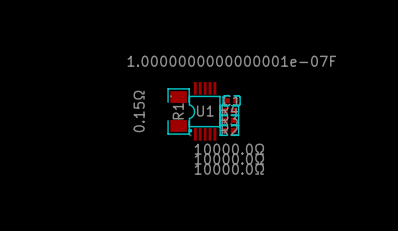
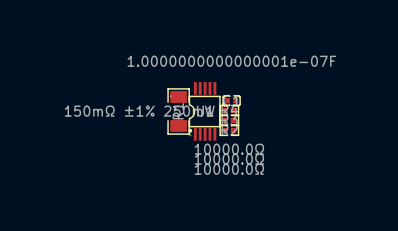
R1 value: 0.15Ω (139, 111) -> 150mΩ ±1% 250mW (139, 111)

